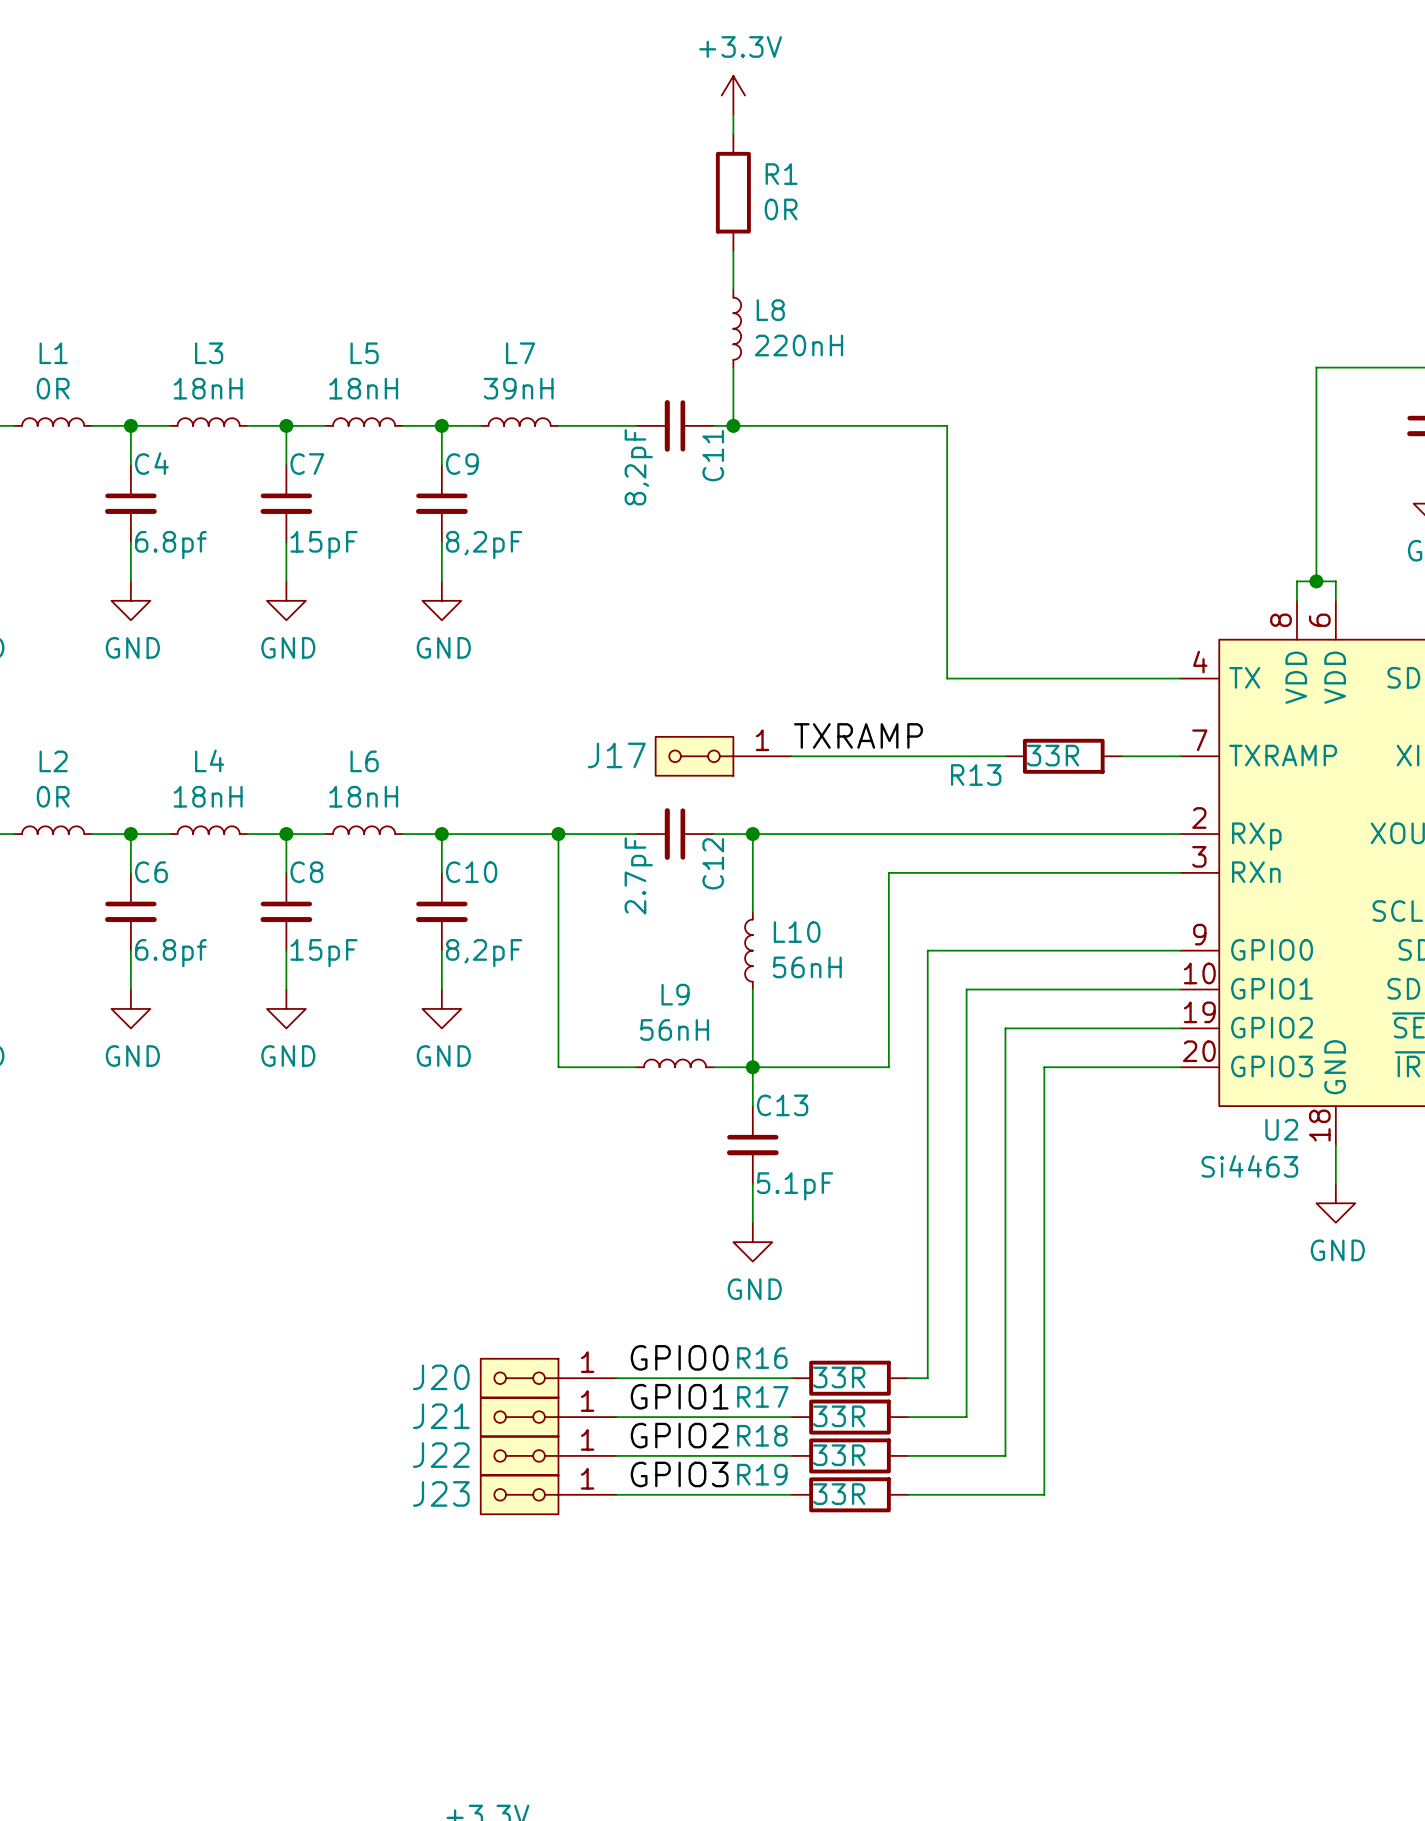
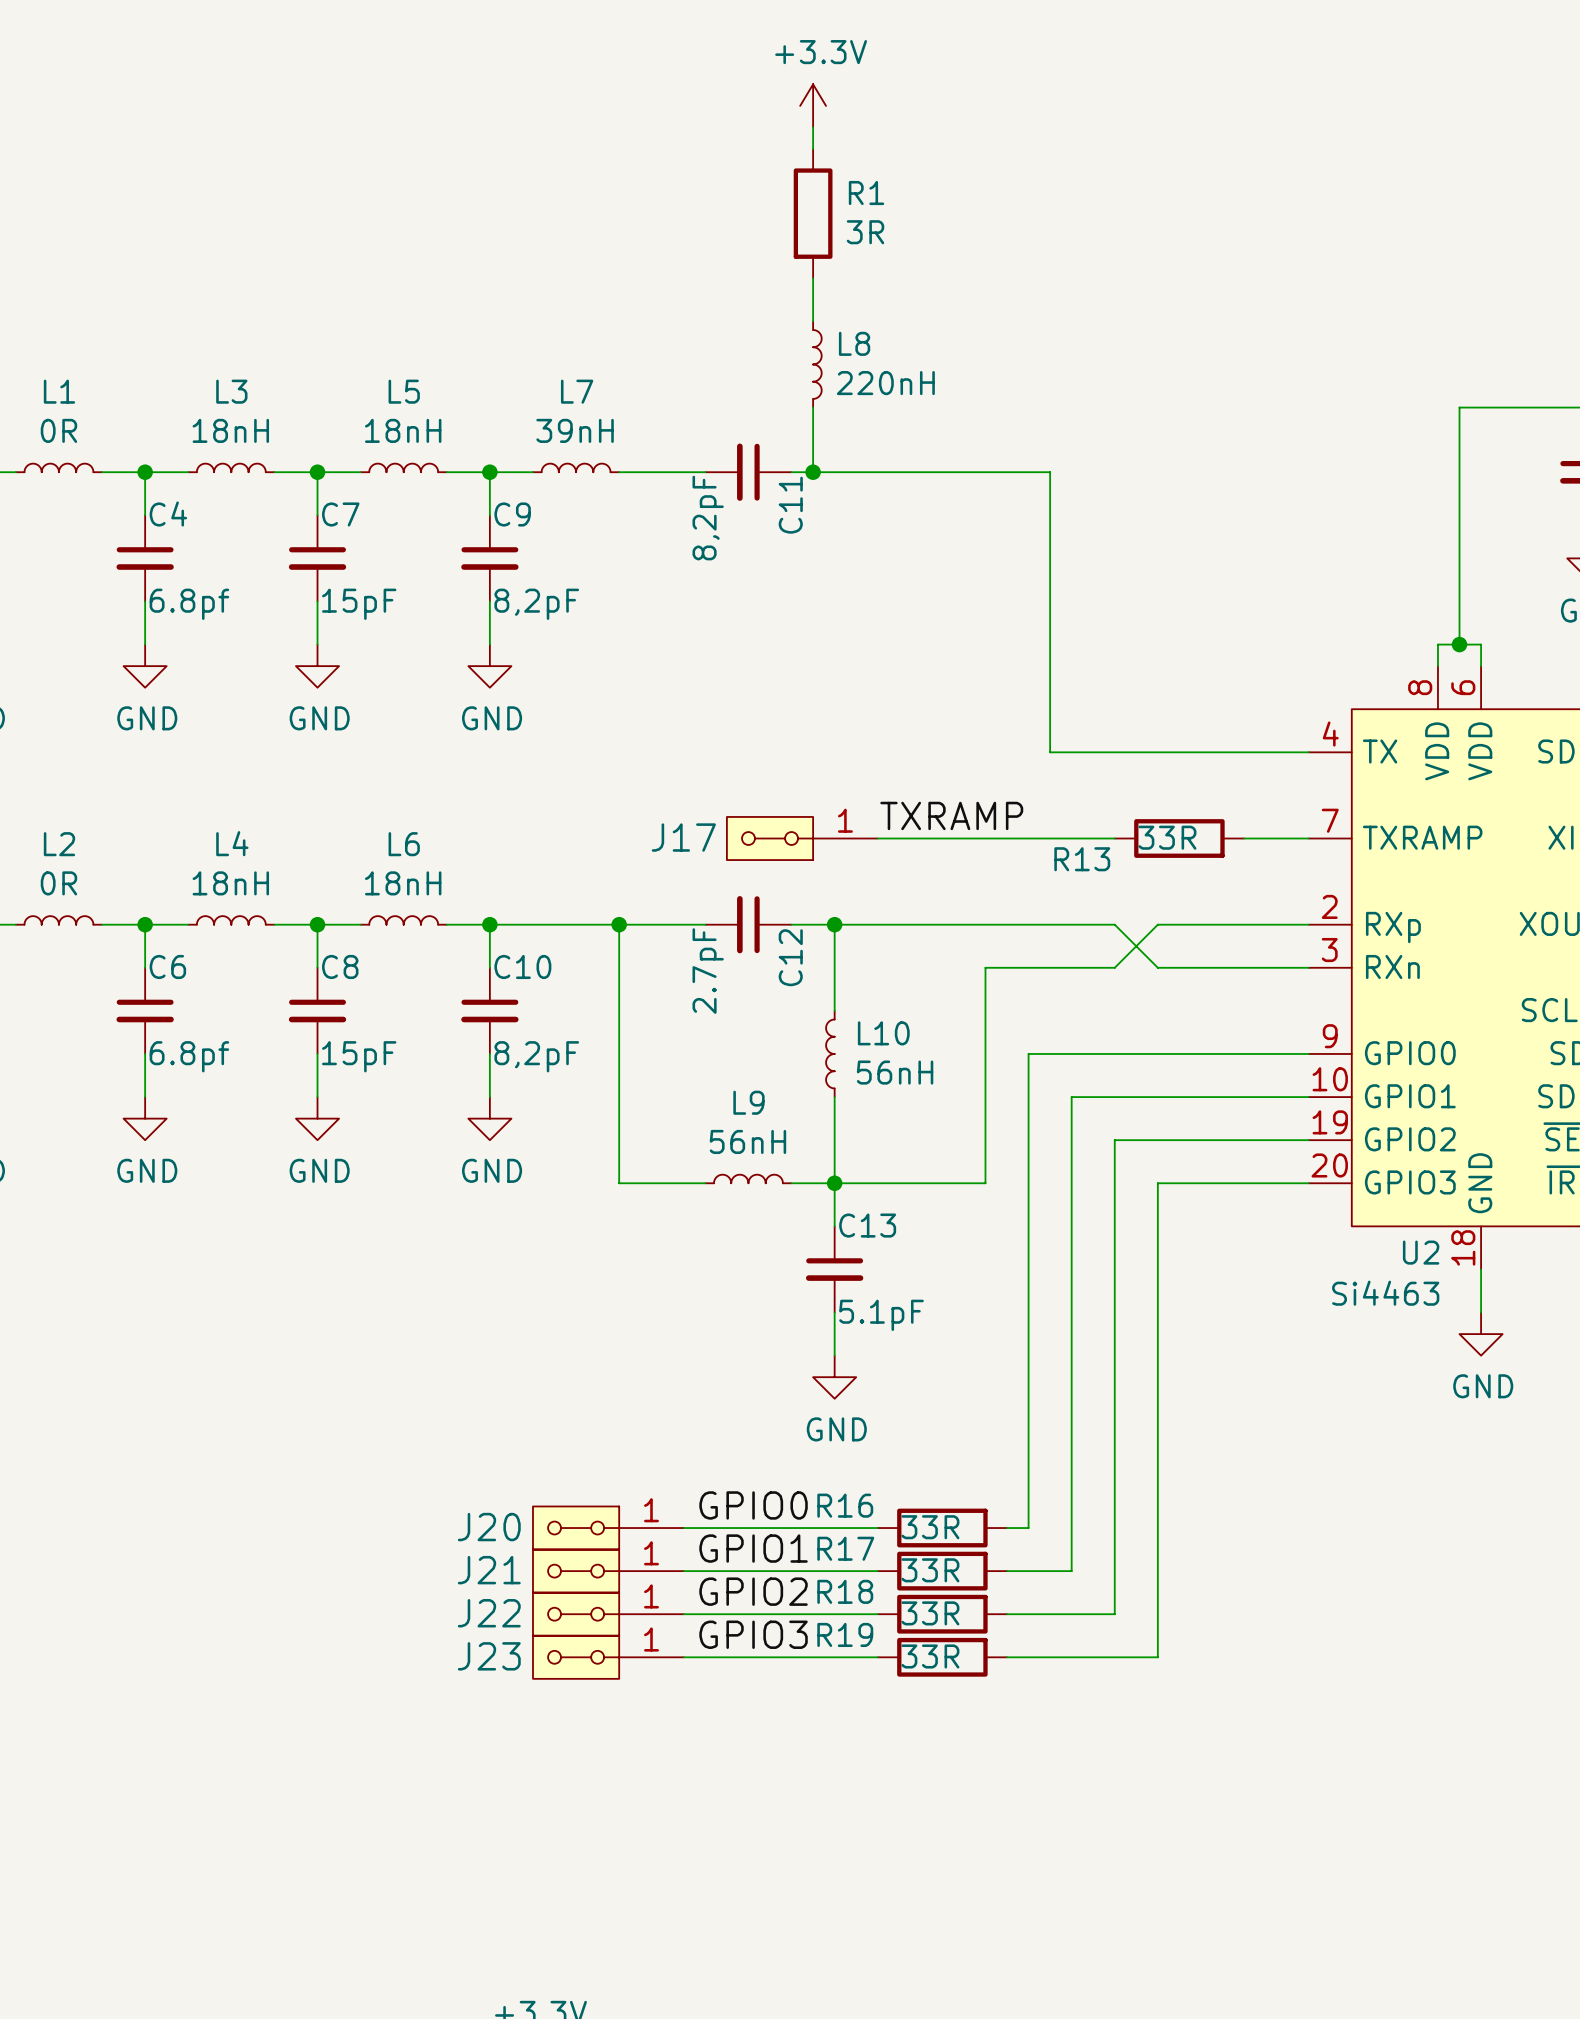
R1 value: 0R (781, 209) -> 3R (865, 232)
wire: (1005, 834) (1044, 834) -> (1114, 924) (1157, 967)
wire: (1005, 872) (1044, 872) -> (1114, 967) (1157, 924)

